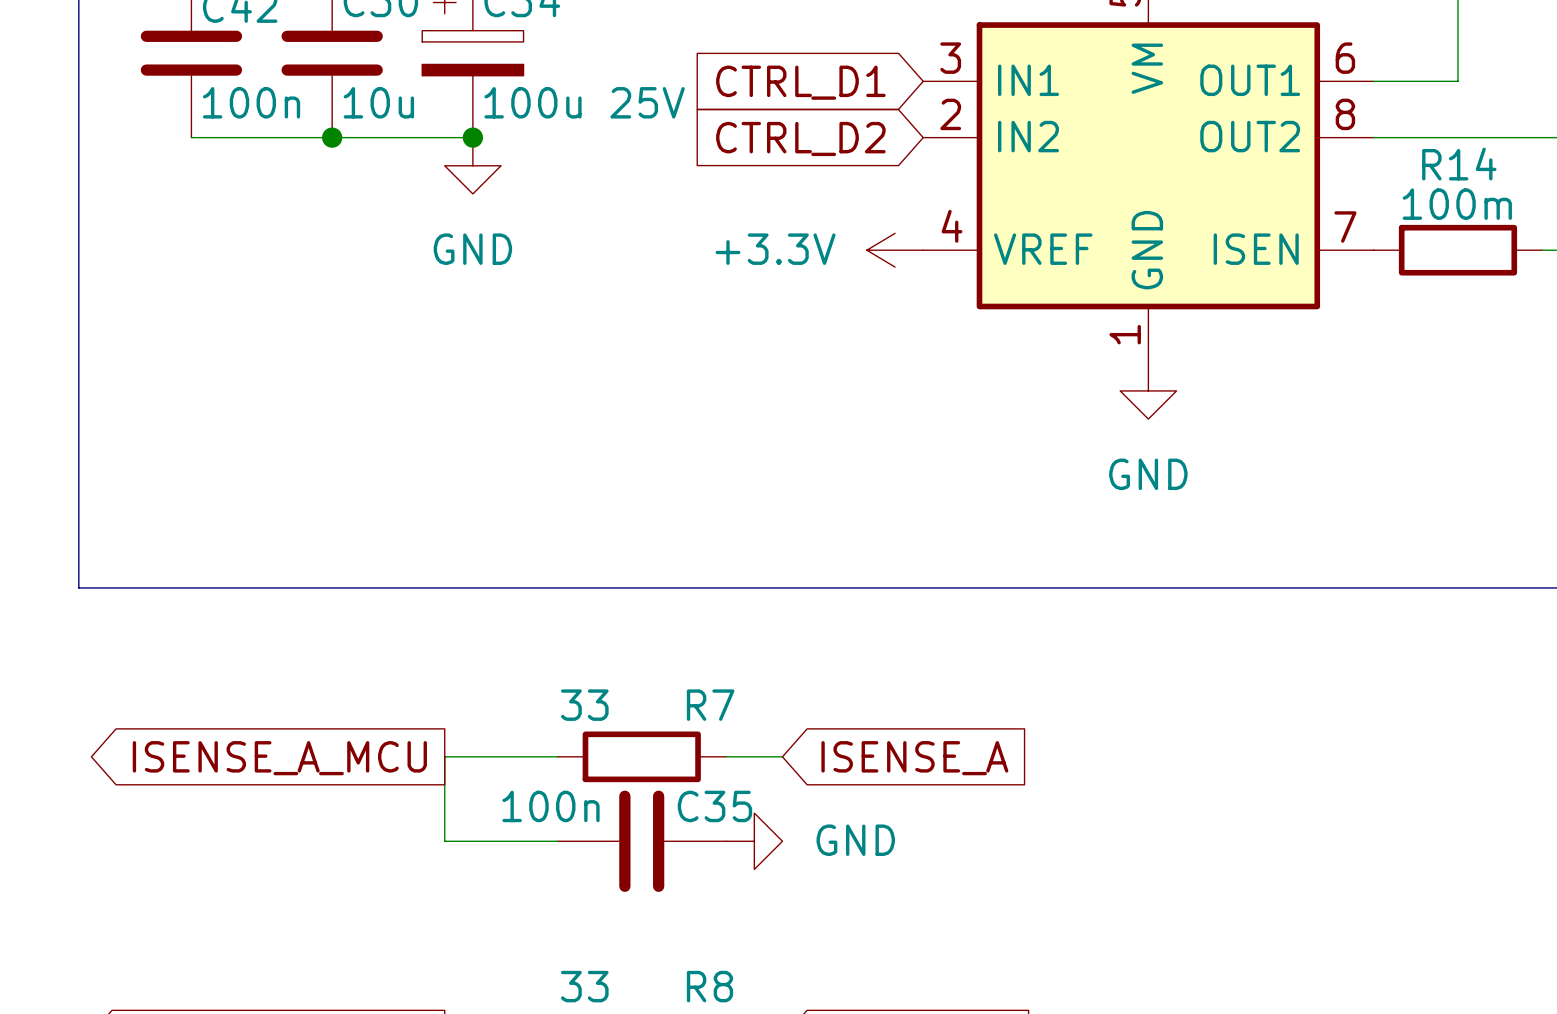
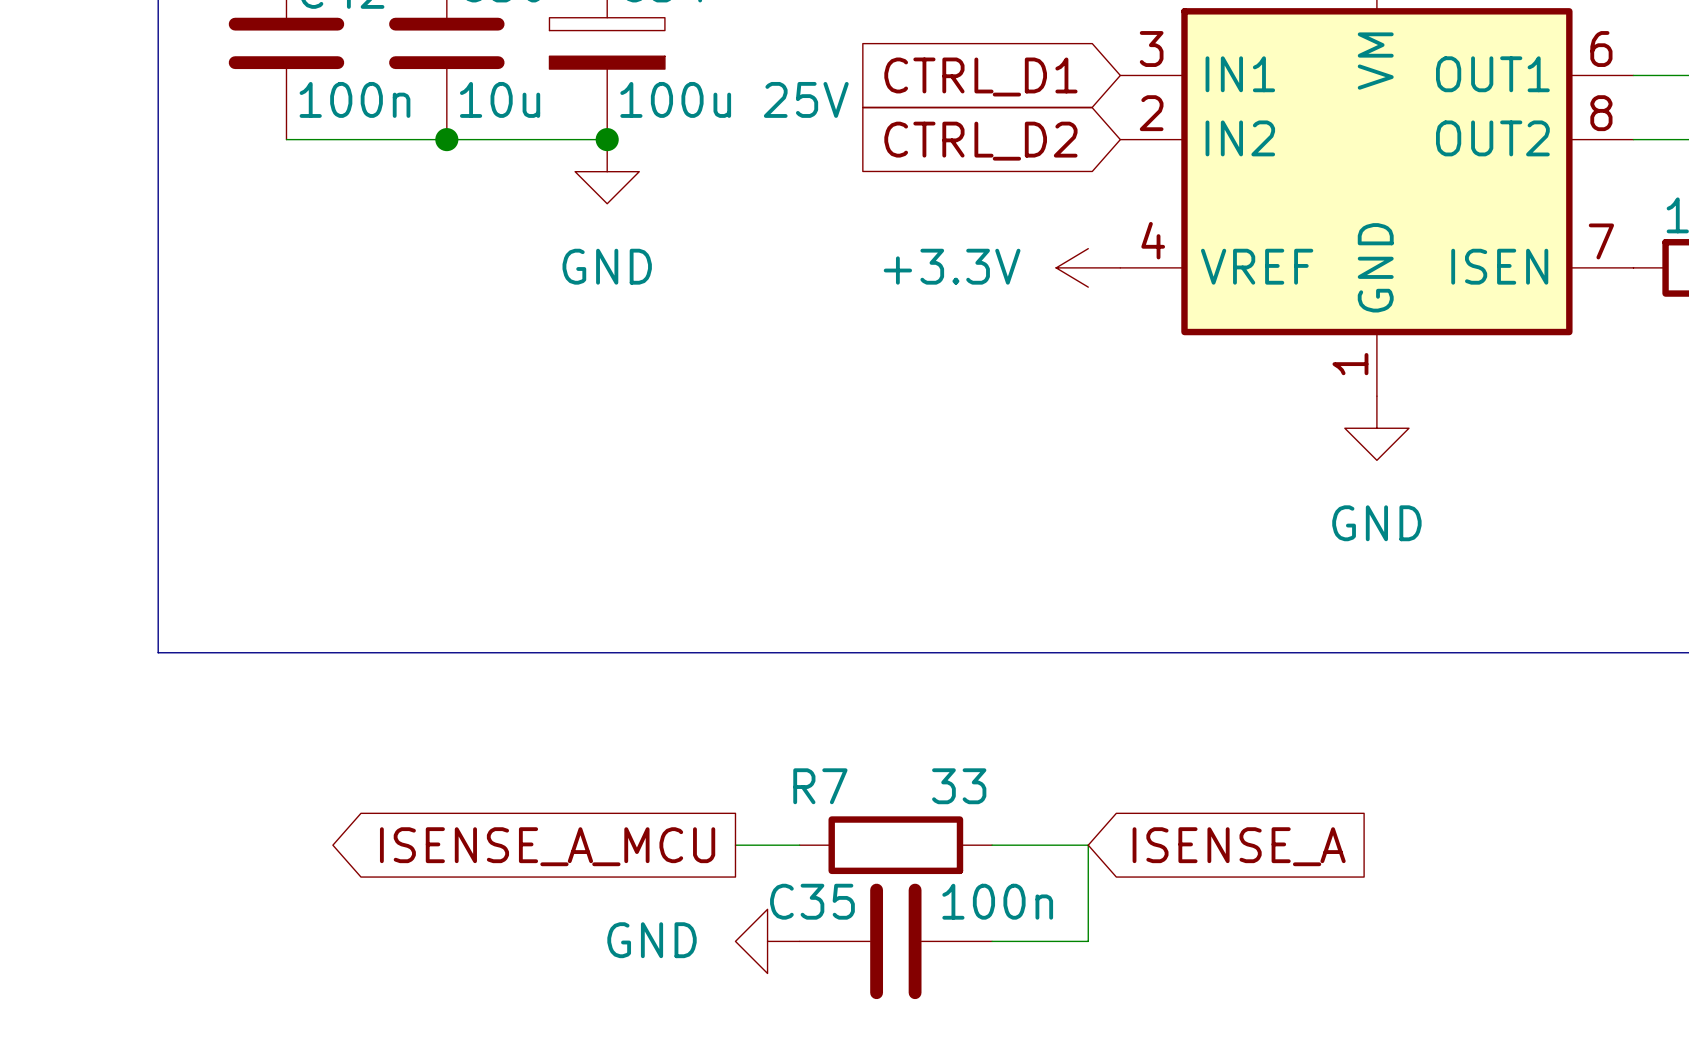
R7 value position: 33 (584, 705) -> 33 (959, 786)
R7 name position: R7 (710, 705) -> R7 (820, 786)
wire: (557, 756) (444, 756) (444, 841) (557, 841) -> none
R7 position: (641, 756) -> (895, 845)
wire: (726, 756) (782, 756) -> (735, 845) (799, 845)
wire: none -> (992, 845) (1088, 845) (1088, 941) (992, 941)
global label position: ISENSE_A_MCU (279, 758) -> ISENSE_A_MCU (547, 846)
global label position: ISENSE_A (914, 758) -> ISENSE_A (1239, 846)
C35 value position: 100n (551, 806) -> 100n (997, 901)
C35 name position: C35 (714, 806) -> C35 (812, 901)
C35 position: (641, 841) -> (895, 941)
power symbol rotation: 0° (754, 841) -> 180° (767, 941)
power symbol position: GND (754, 841) -> GND (767, 941)

